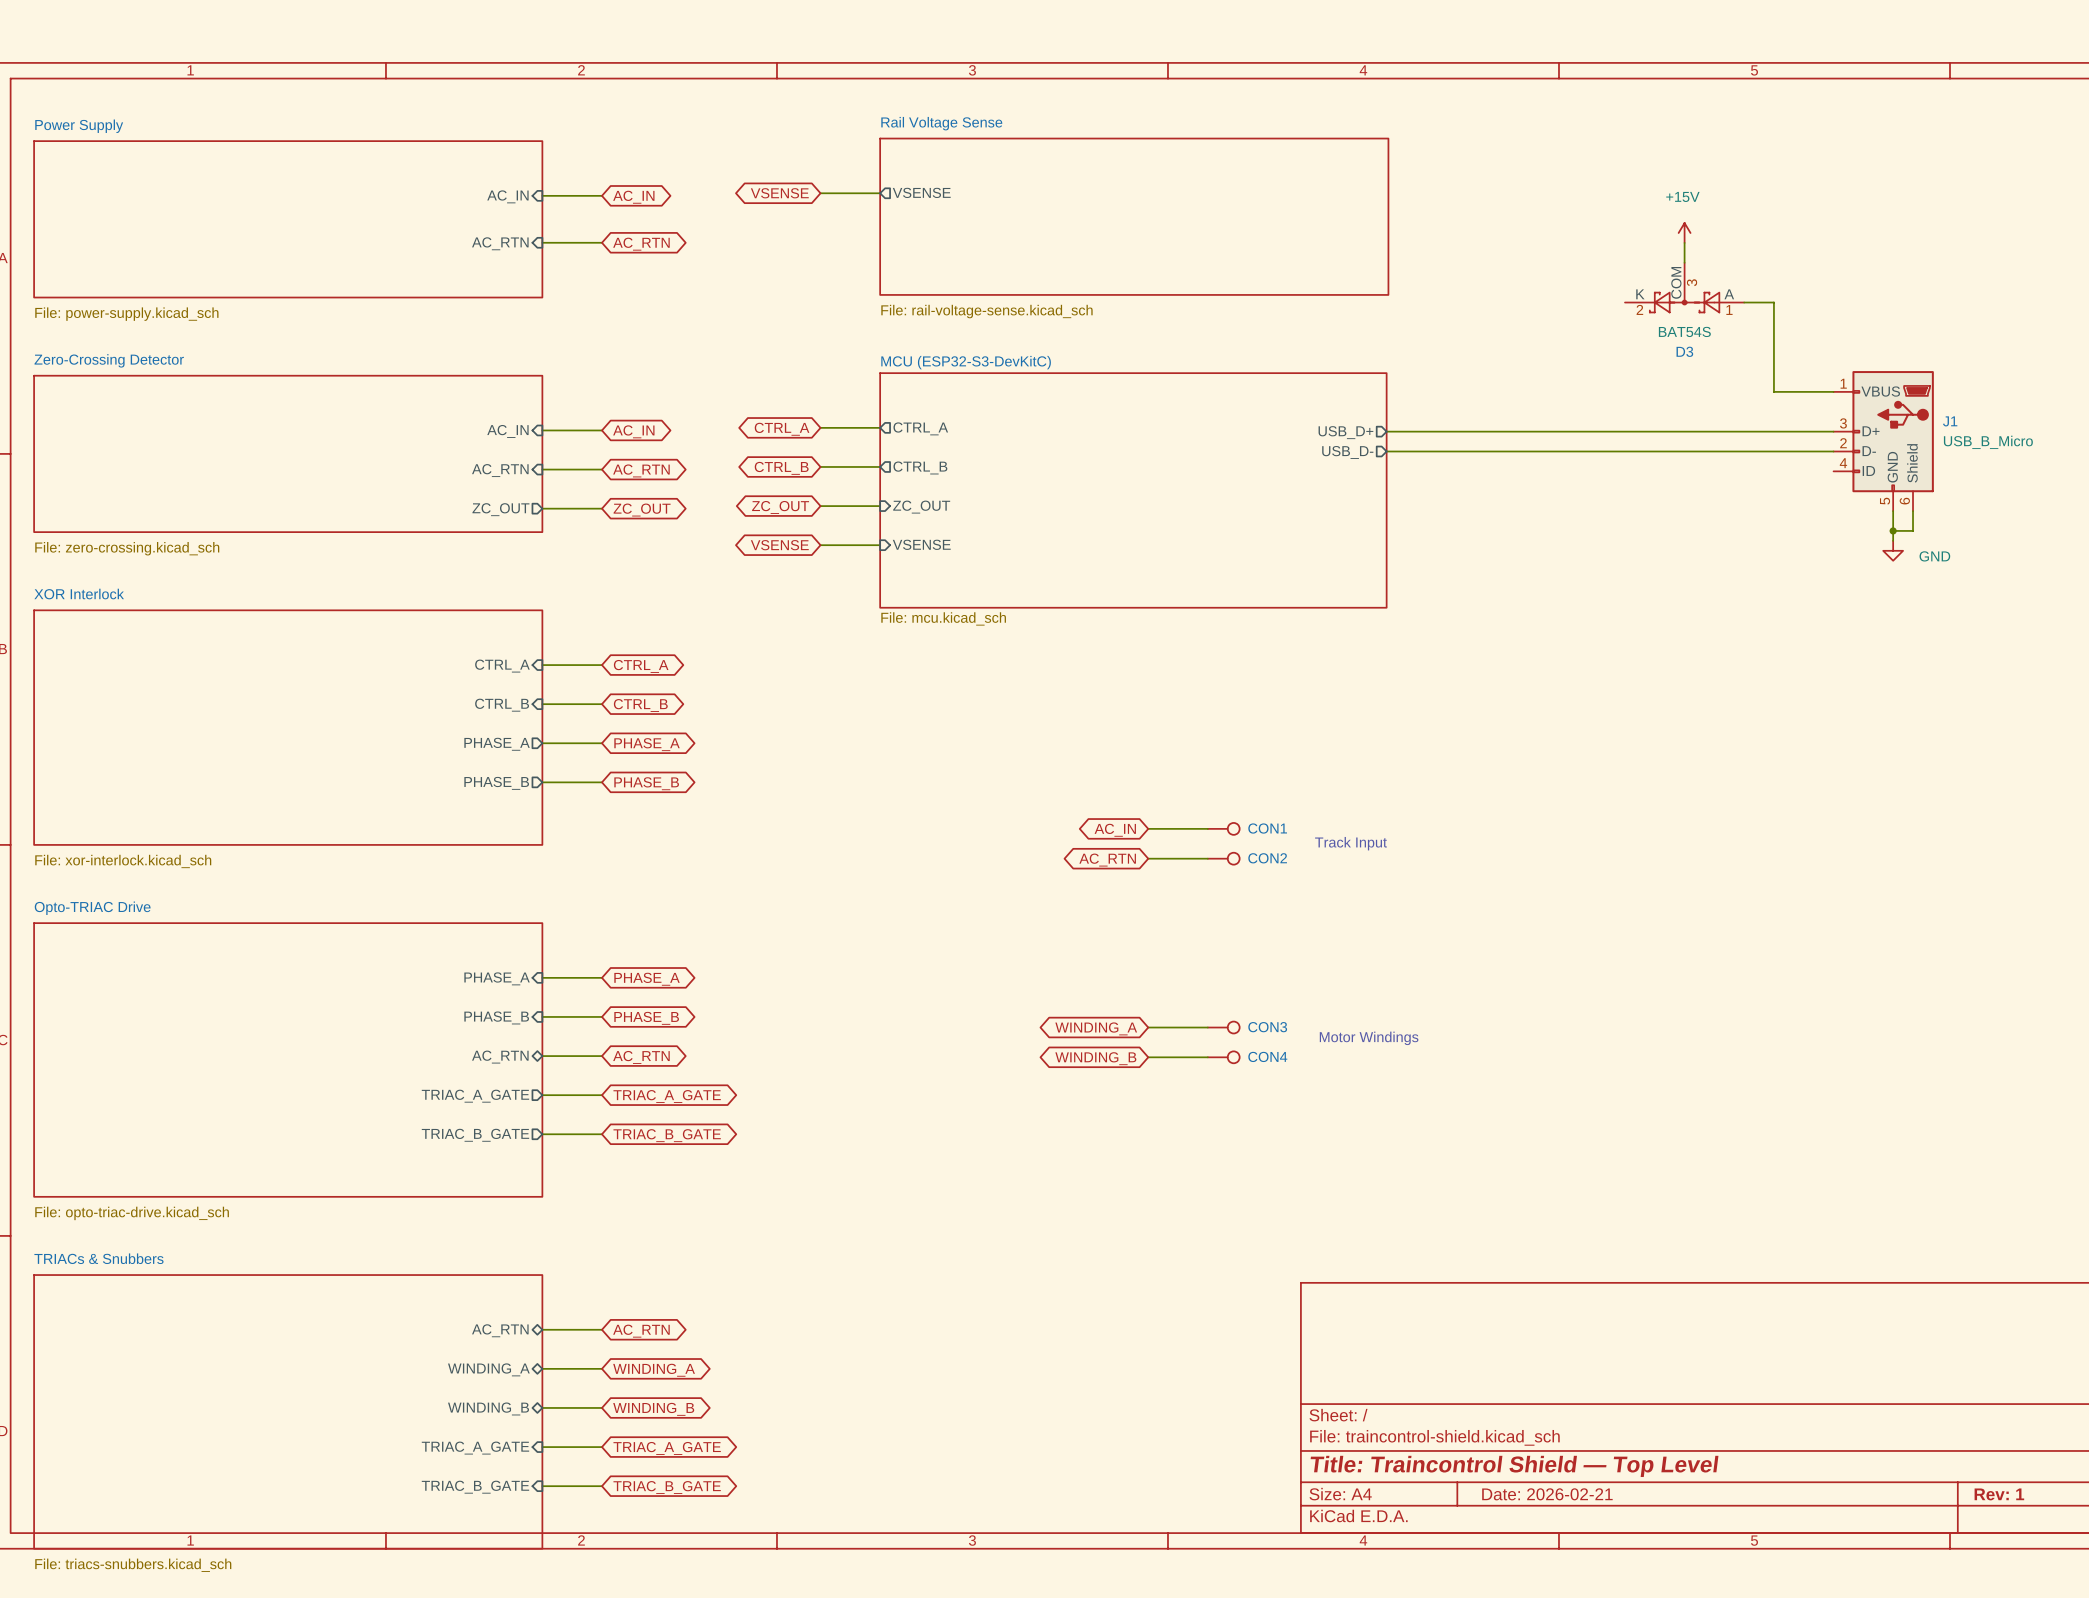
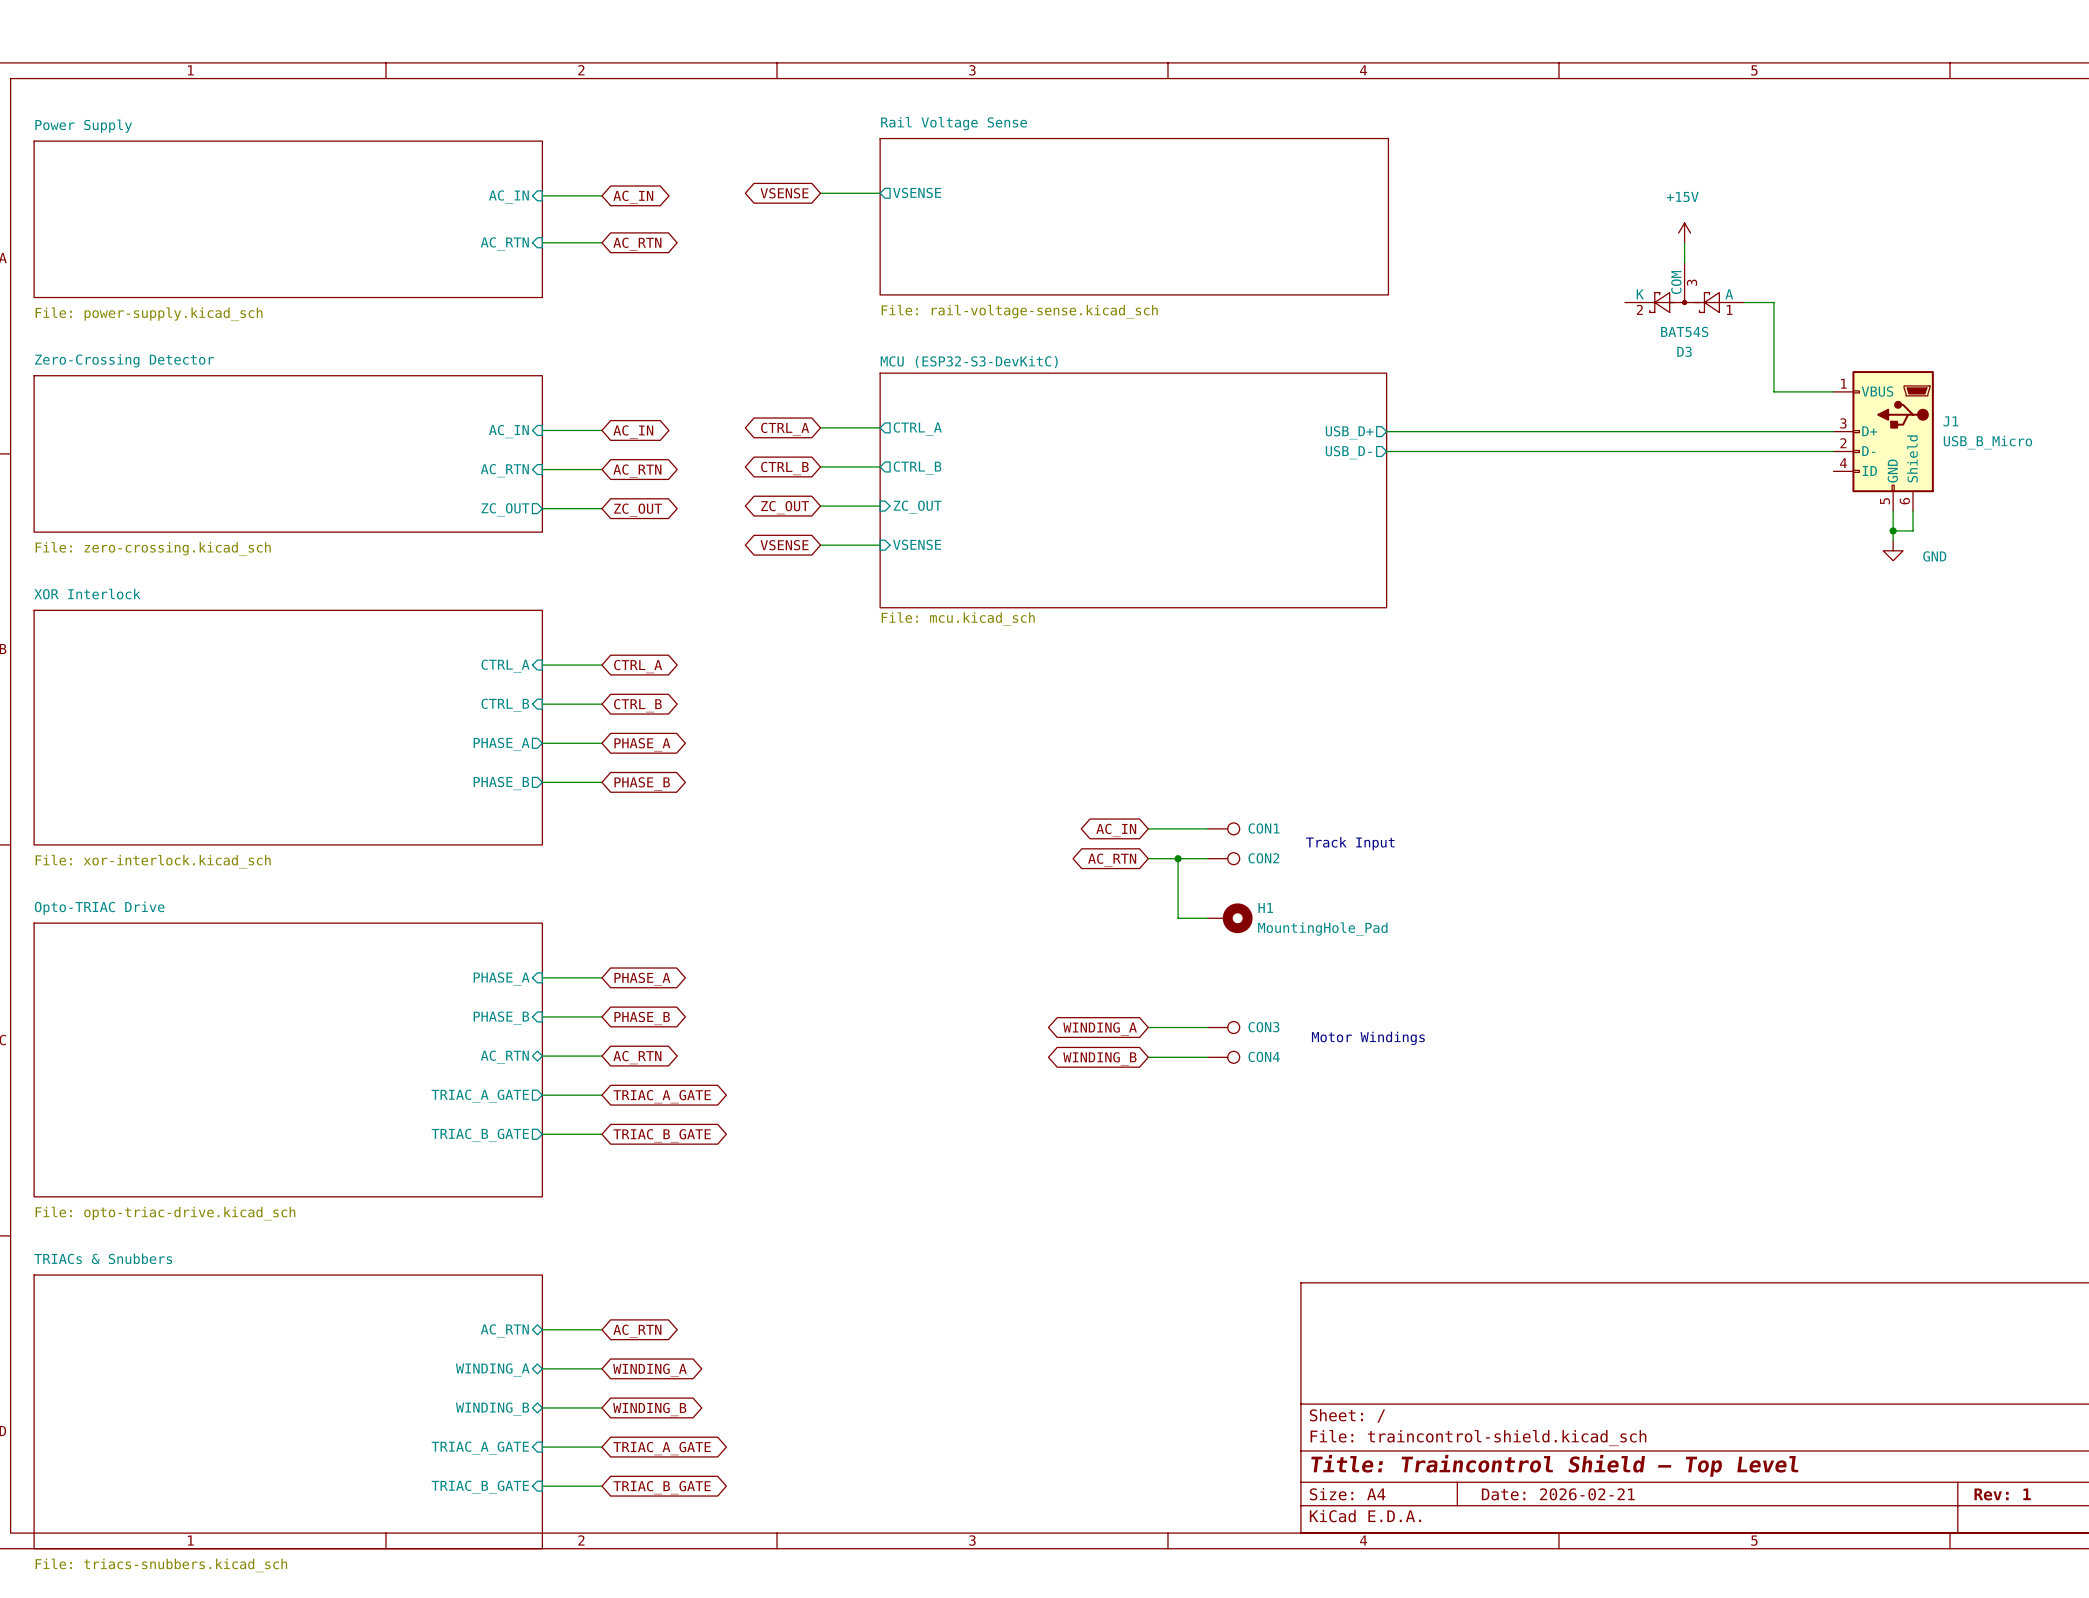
wire: none -> (1178, 858) (1178, 918) (1207, 918)
junction: none -> (1178, 858)
H1: none -> MountingHole_Pad (1230, 918)

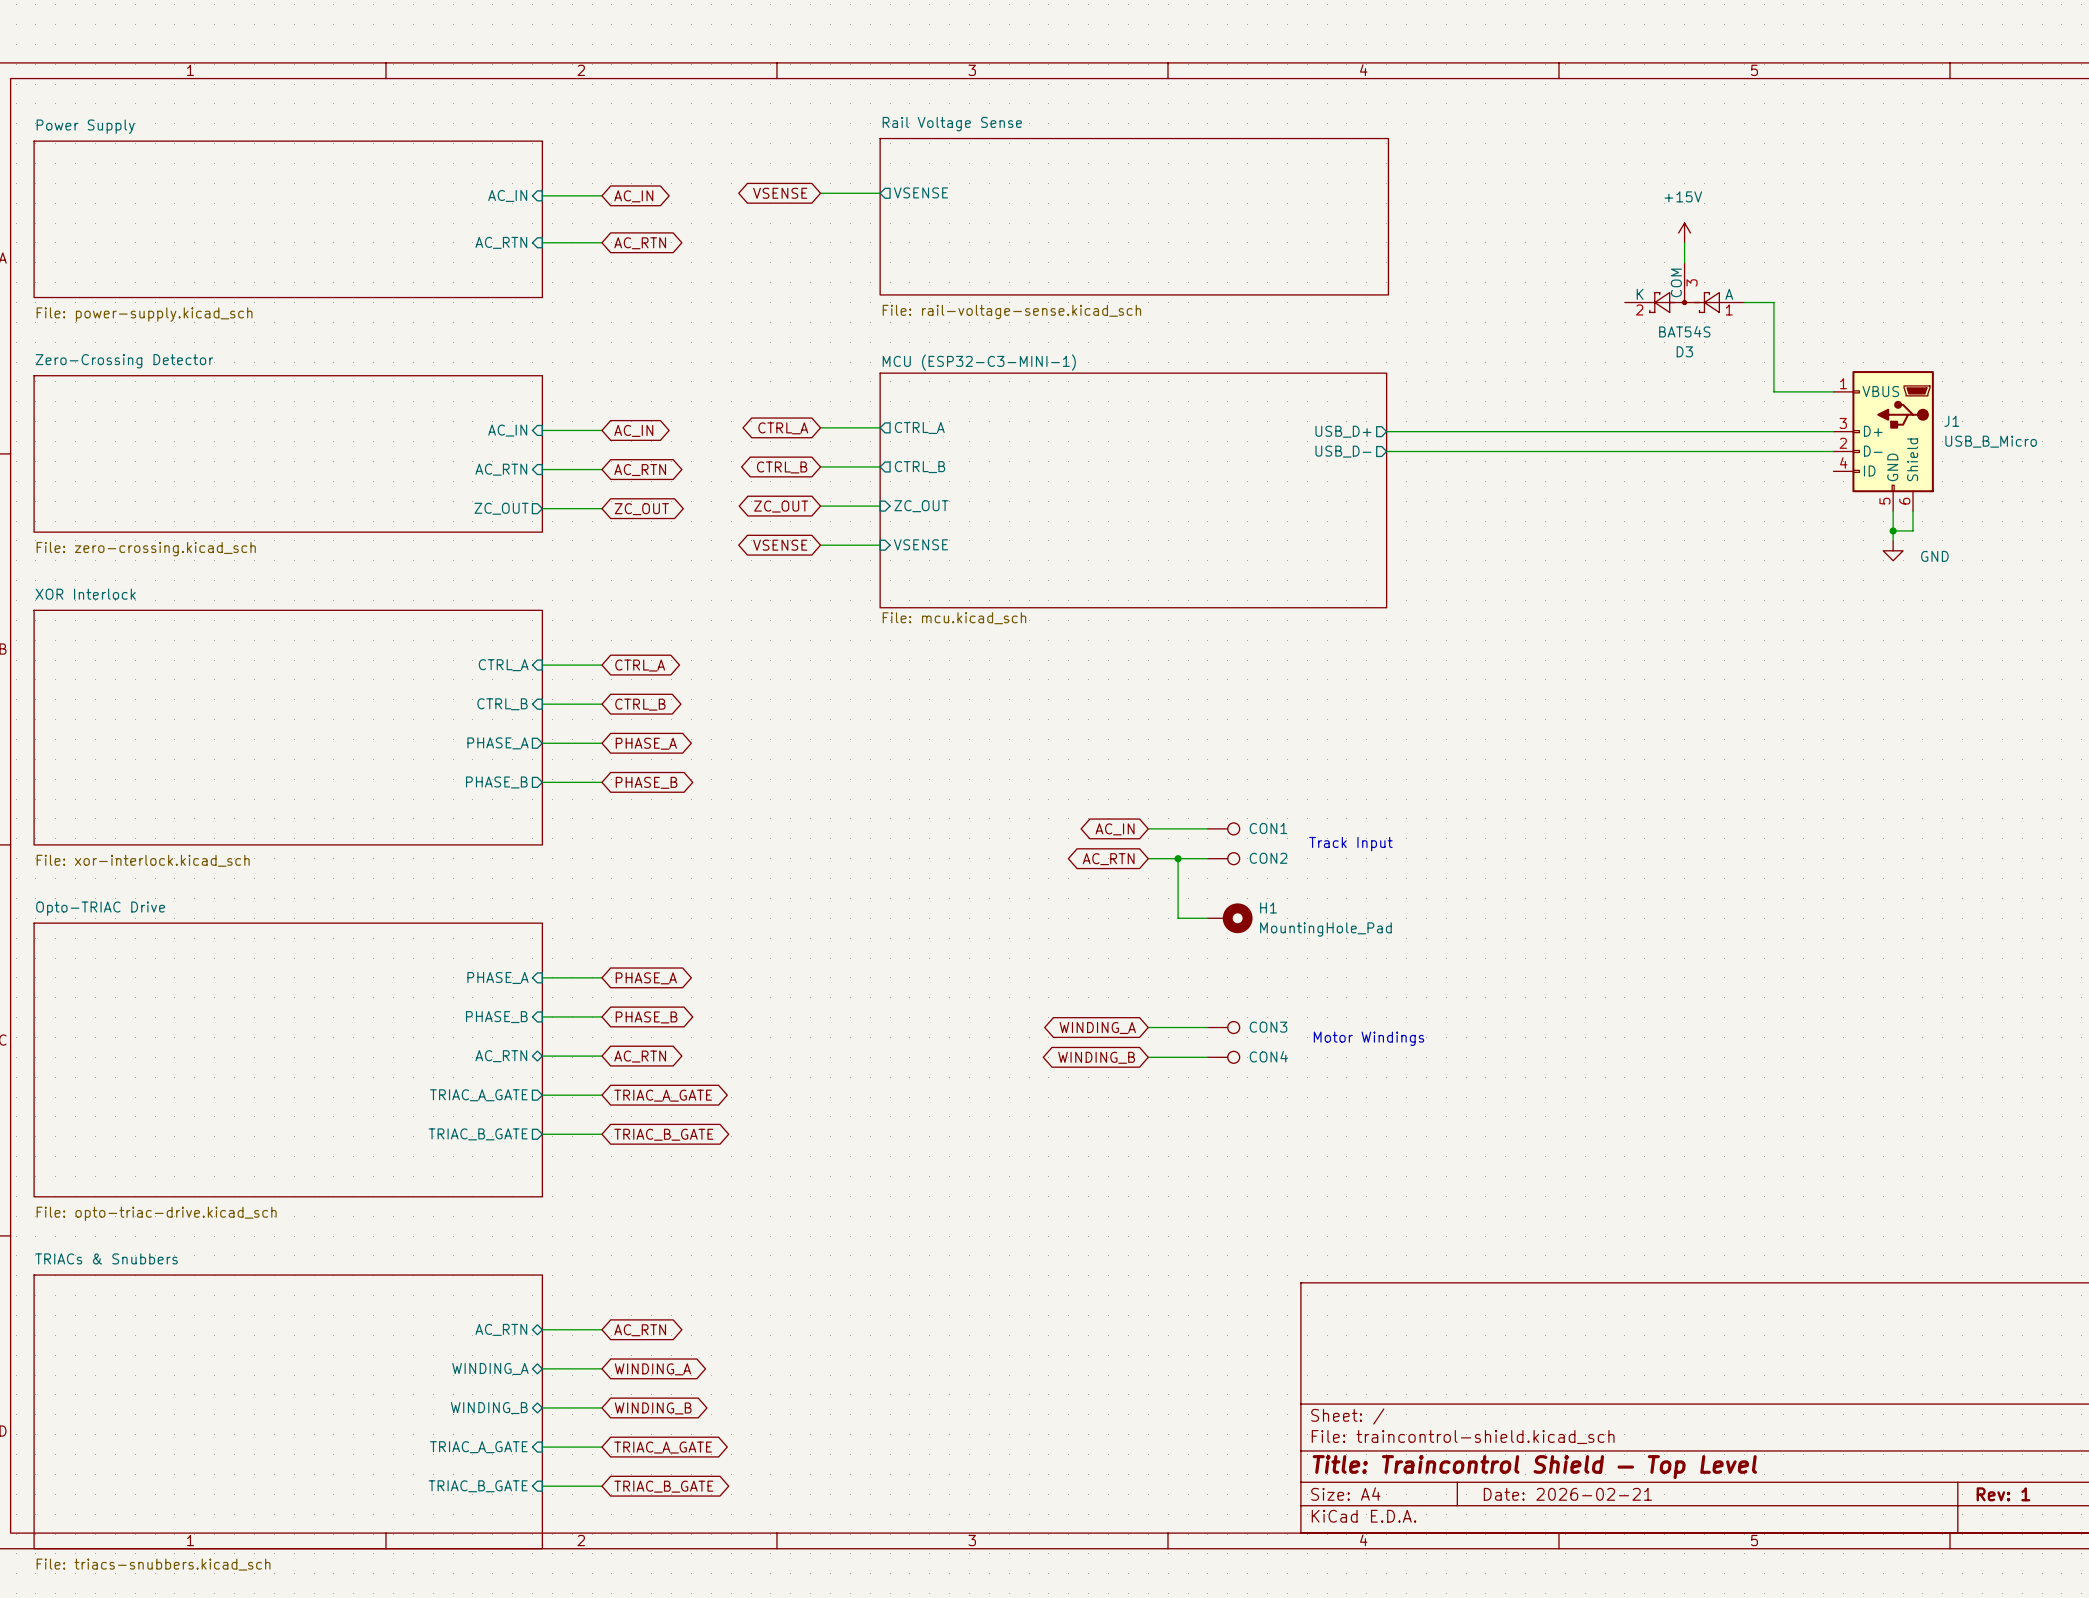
sheet MCU (ESP32-S3-DevKitC) name: MCU (ESP32-S3-DevKitC) (969, 362) -> MCU (ESP32-C3-MINI-1) (979, 362)

